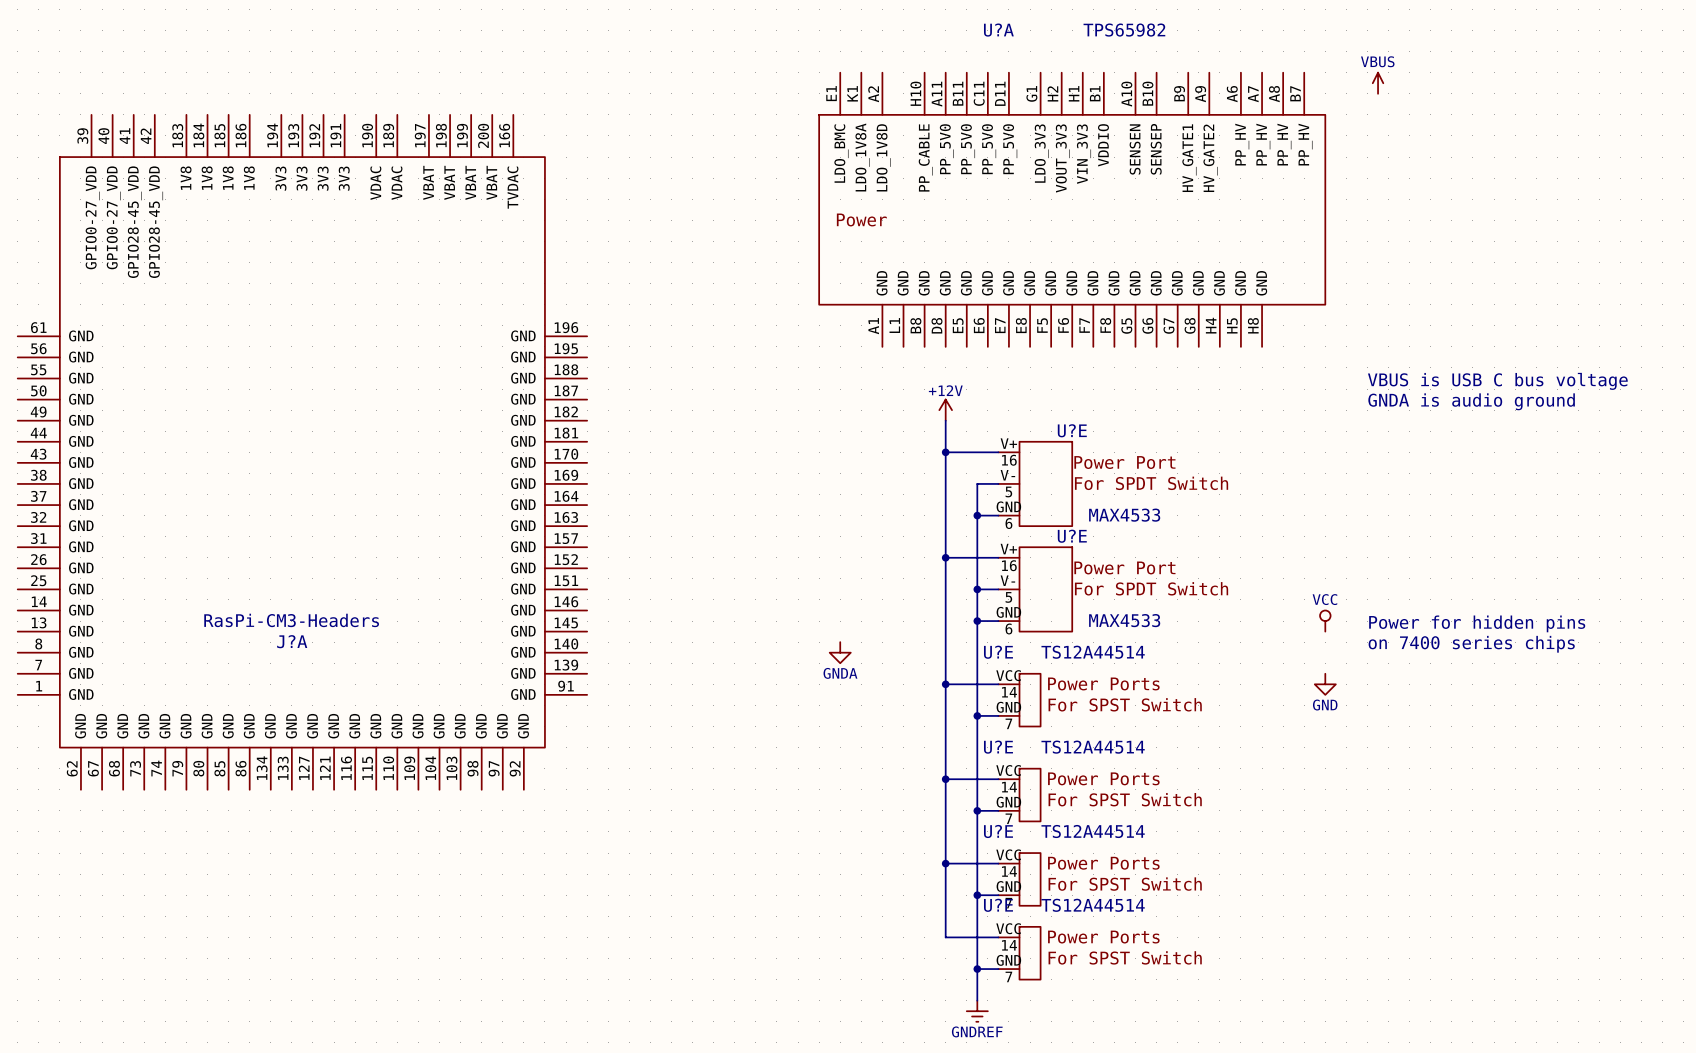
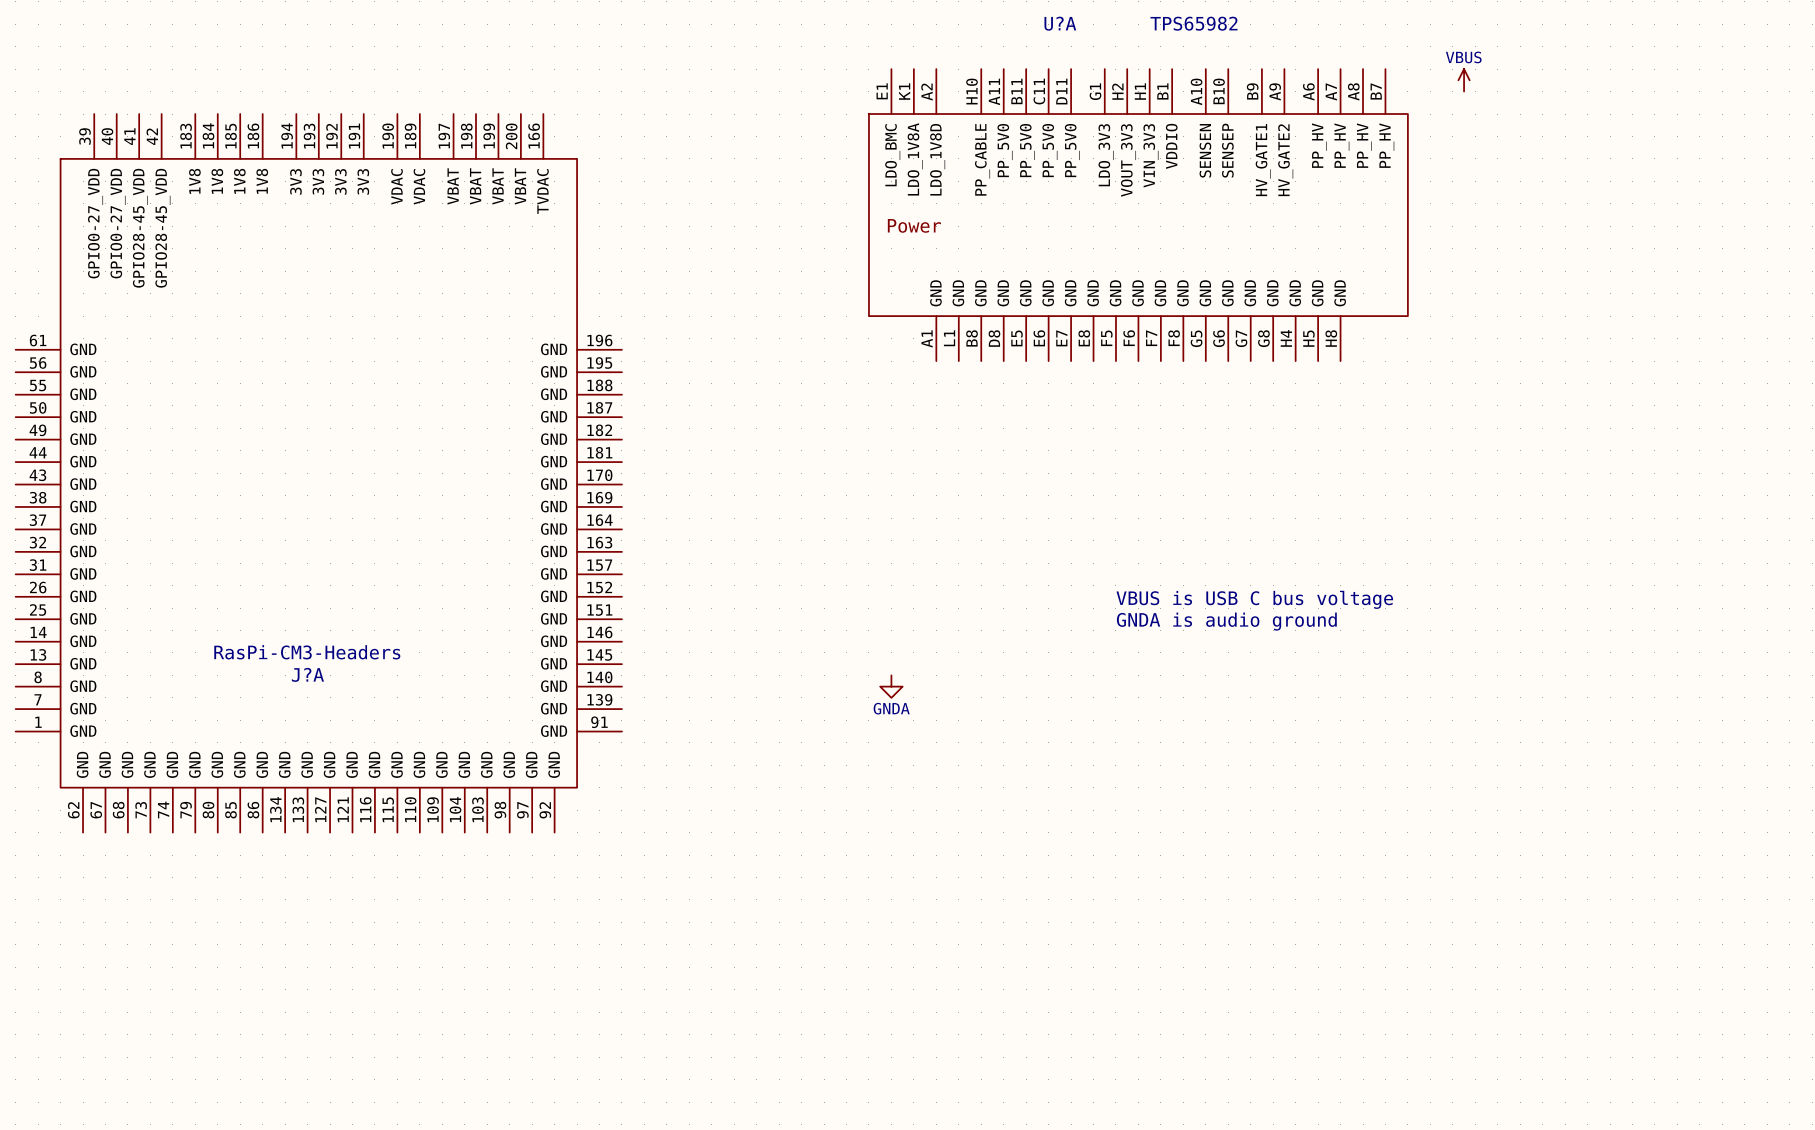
text: VBUS is USB C bus voltage (1497, 381) -> none
text: GNDA is audio ground (1471, 401) -> none
power symbol: +12V (945, 410) -> none
wire: (945, 420) (945, 937) (998, 937) -> none
wire: (945, 452) (998, 452) -> none
junction: (945, 452) -> none
wire: (998, 483) (977, 483) (977, 1000) -> none
U?E: MAX4533 (1035, 483) -> none
wire: (977, 515) (998, 515) -> none
junction: (977, 515) -> none
wire: (945, 557) (998, 557) -> none
junction: (945, 557) -> none
text: none -> VBUS is USB C bus voltage (1254, 599)
wire: (977, 589) (998, 589) -> none
junction: (977, 589) -> none
U?E: MAX4533 (1035, 589) -> none
text: none -> GNDA is audio ground (1226, 621)
wire: (977, 621) (998, 621) -> none
junction: (977, 621) -> none
power symbol: VCC (1325, 621) -> none
text: Power for hidden pins (1477, 623) -> none
text: on 7400 series chips (1471, 644) -> none
wire: (945, 684) (998, 684) -> none
junction: (945, 684) -> none
power symbol: GND (1325, 684) -> none
U?E: TS12A44514 (1019, 700) -> none
wire: (977, 715) (998, 715) -> none
junction: (977, 715) -> none
wire: (945, 779) (998, 779) -> none
junction: (945, 779) -> none
U?E: TS12A44514 (1019, 795) -> none
wire: (977, 810) (998, 810) -> none
junction: (977, 810) -> none
wire: (945, 863) (998, 863) -> none
junction: (945, 863) -> none
U?E: TS12A44514 (1019, 879) -> none
wire: (977, 895) (998, 895) -> none
junction: (977, 895) -> none
U?E: TS12A44514 (1019, 953) -> none
wire: (977, 969) (998, 969) -> none
junction: (977, 969) -> none
power symbol: GNDREF (977, 1011) -> none

